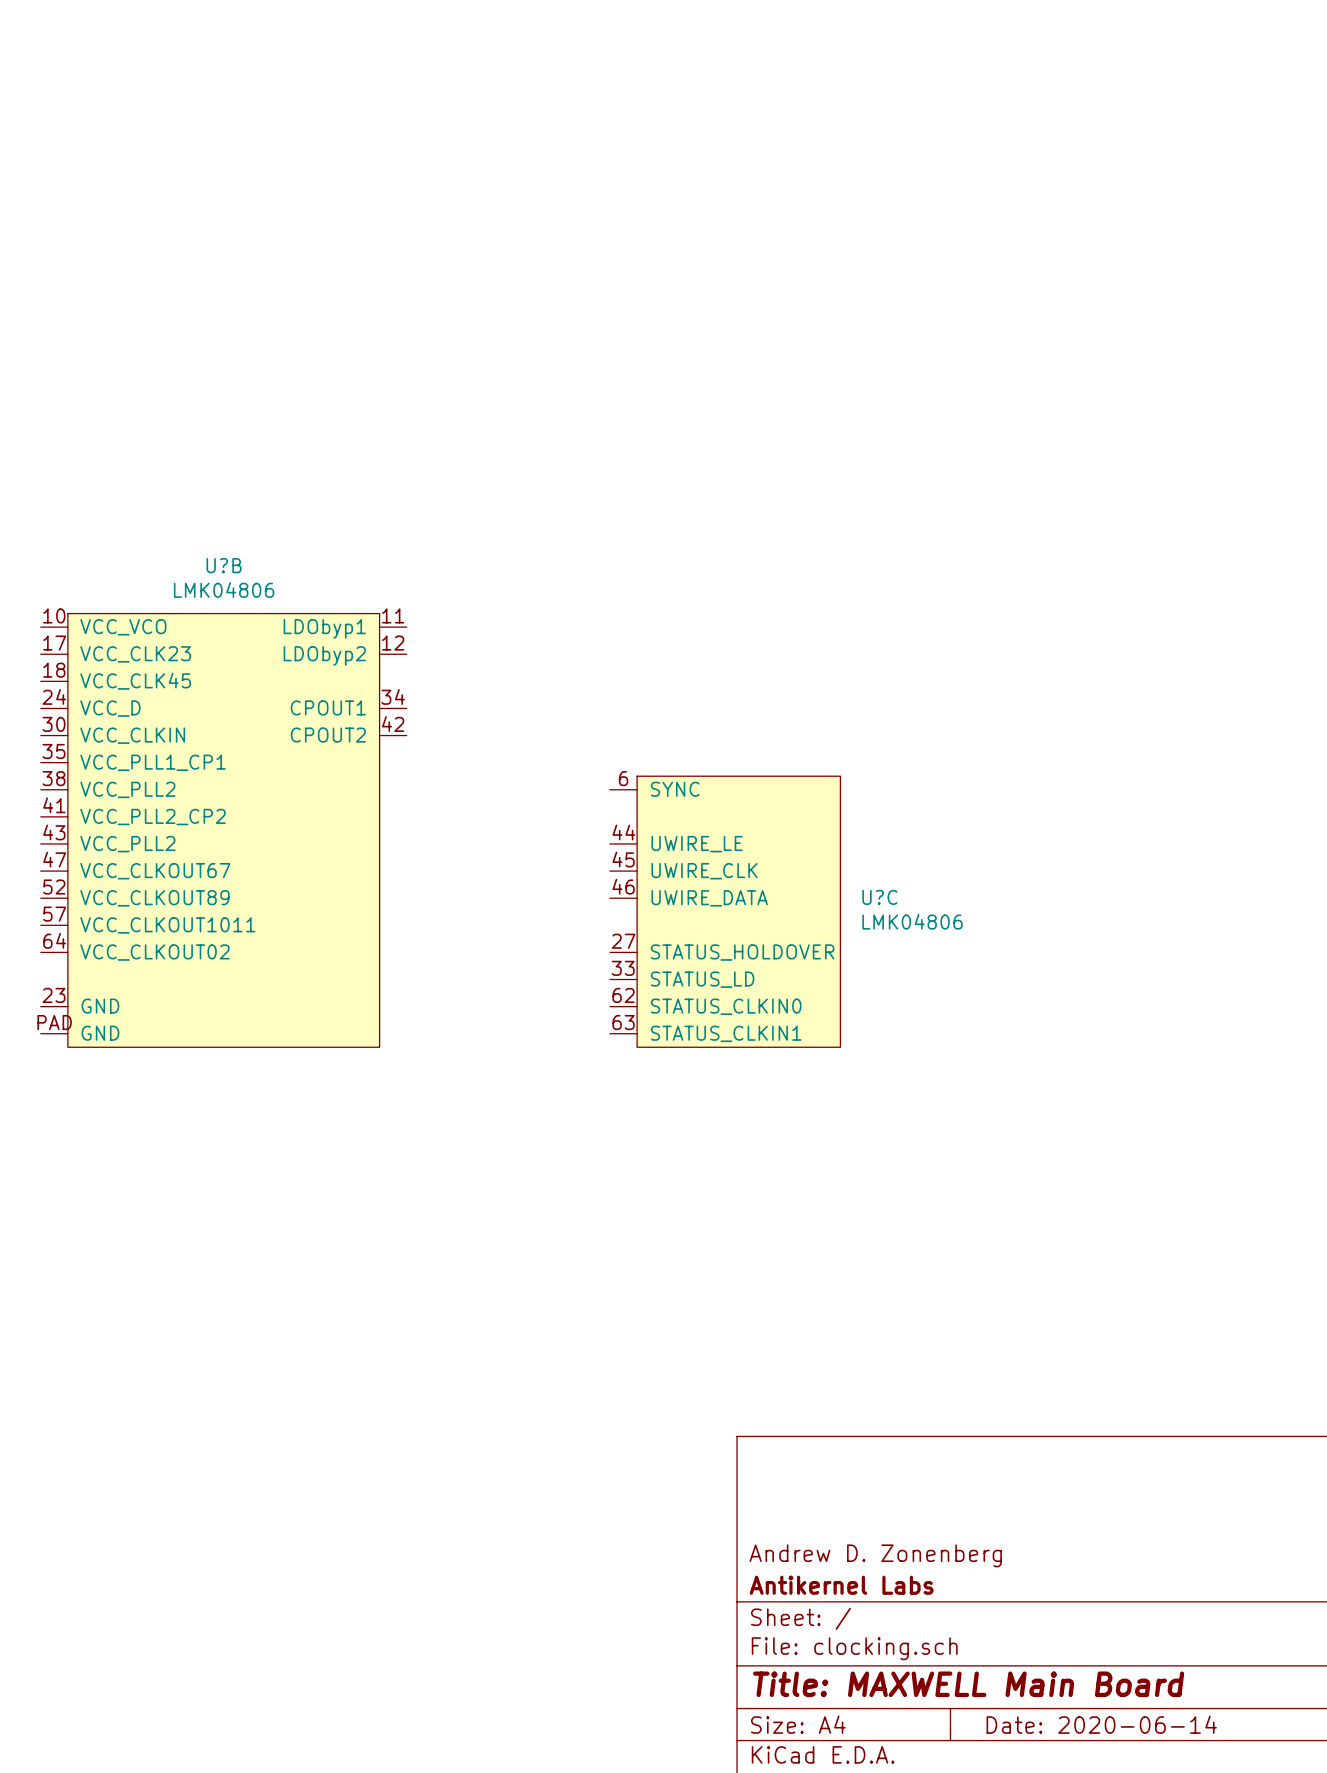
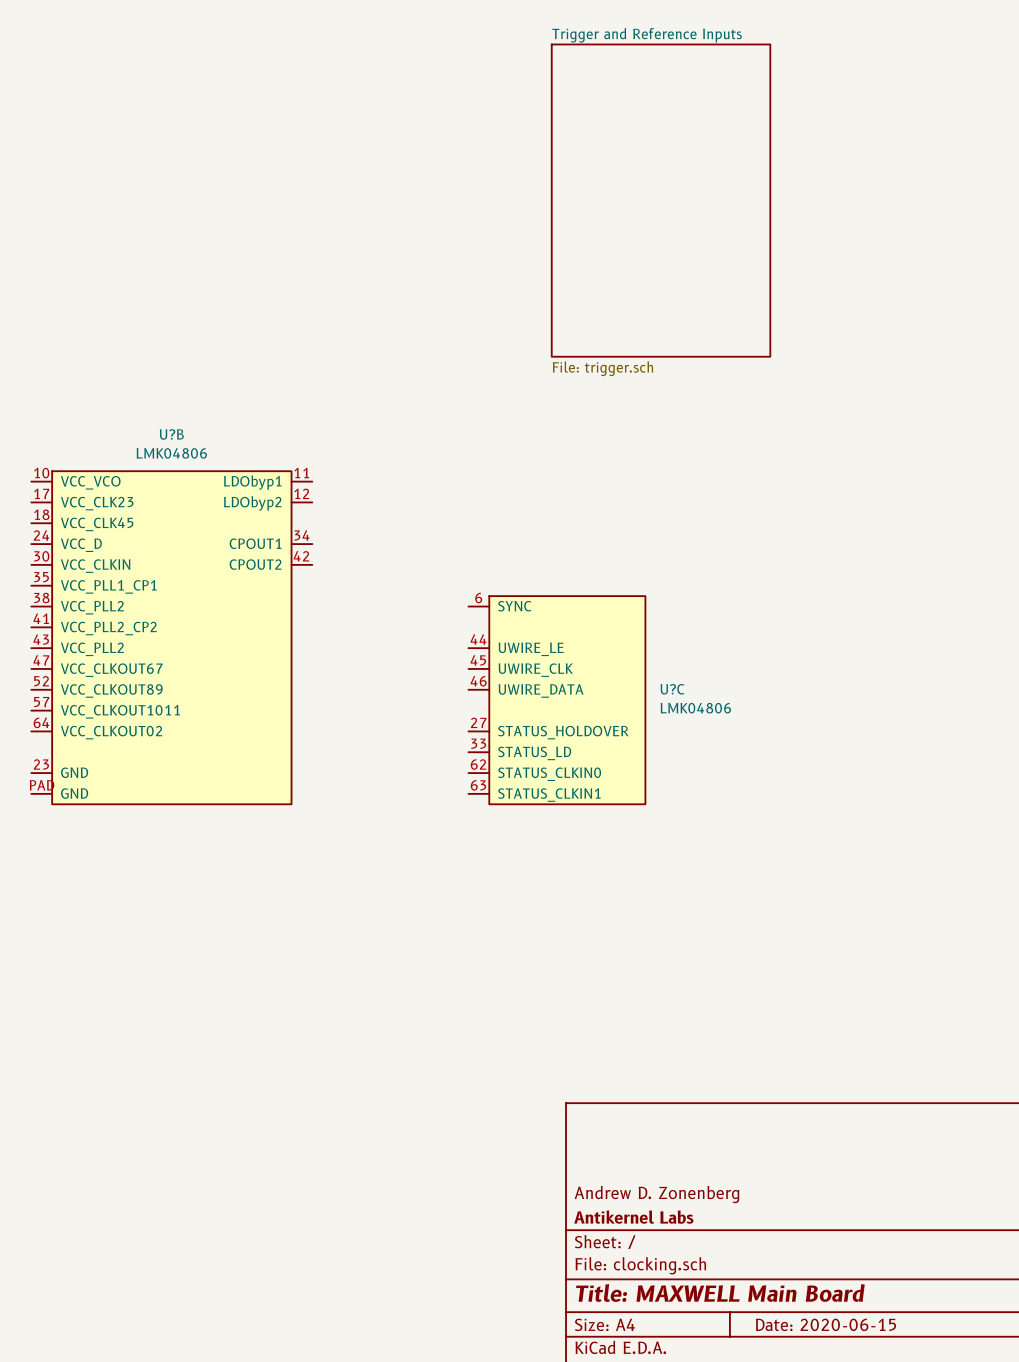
sheet Trigger and Reference Inputs: none -> File: trigger.sch (661, 200)
title block: Date: 2020-06-14 (1101, 1724) -> Date: 2020-06-15 (825, 1324)

